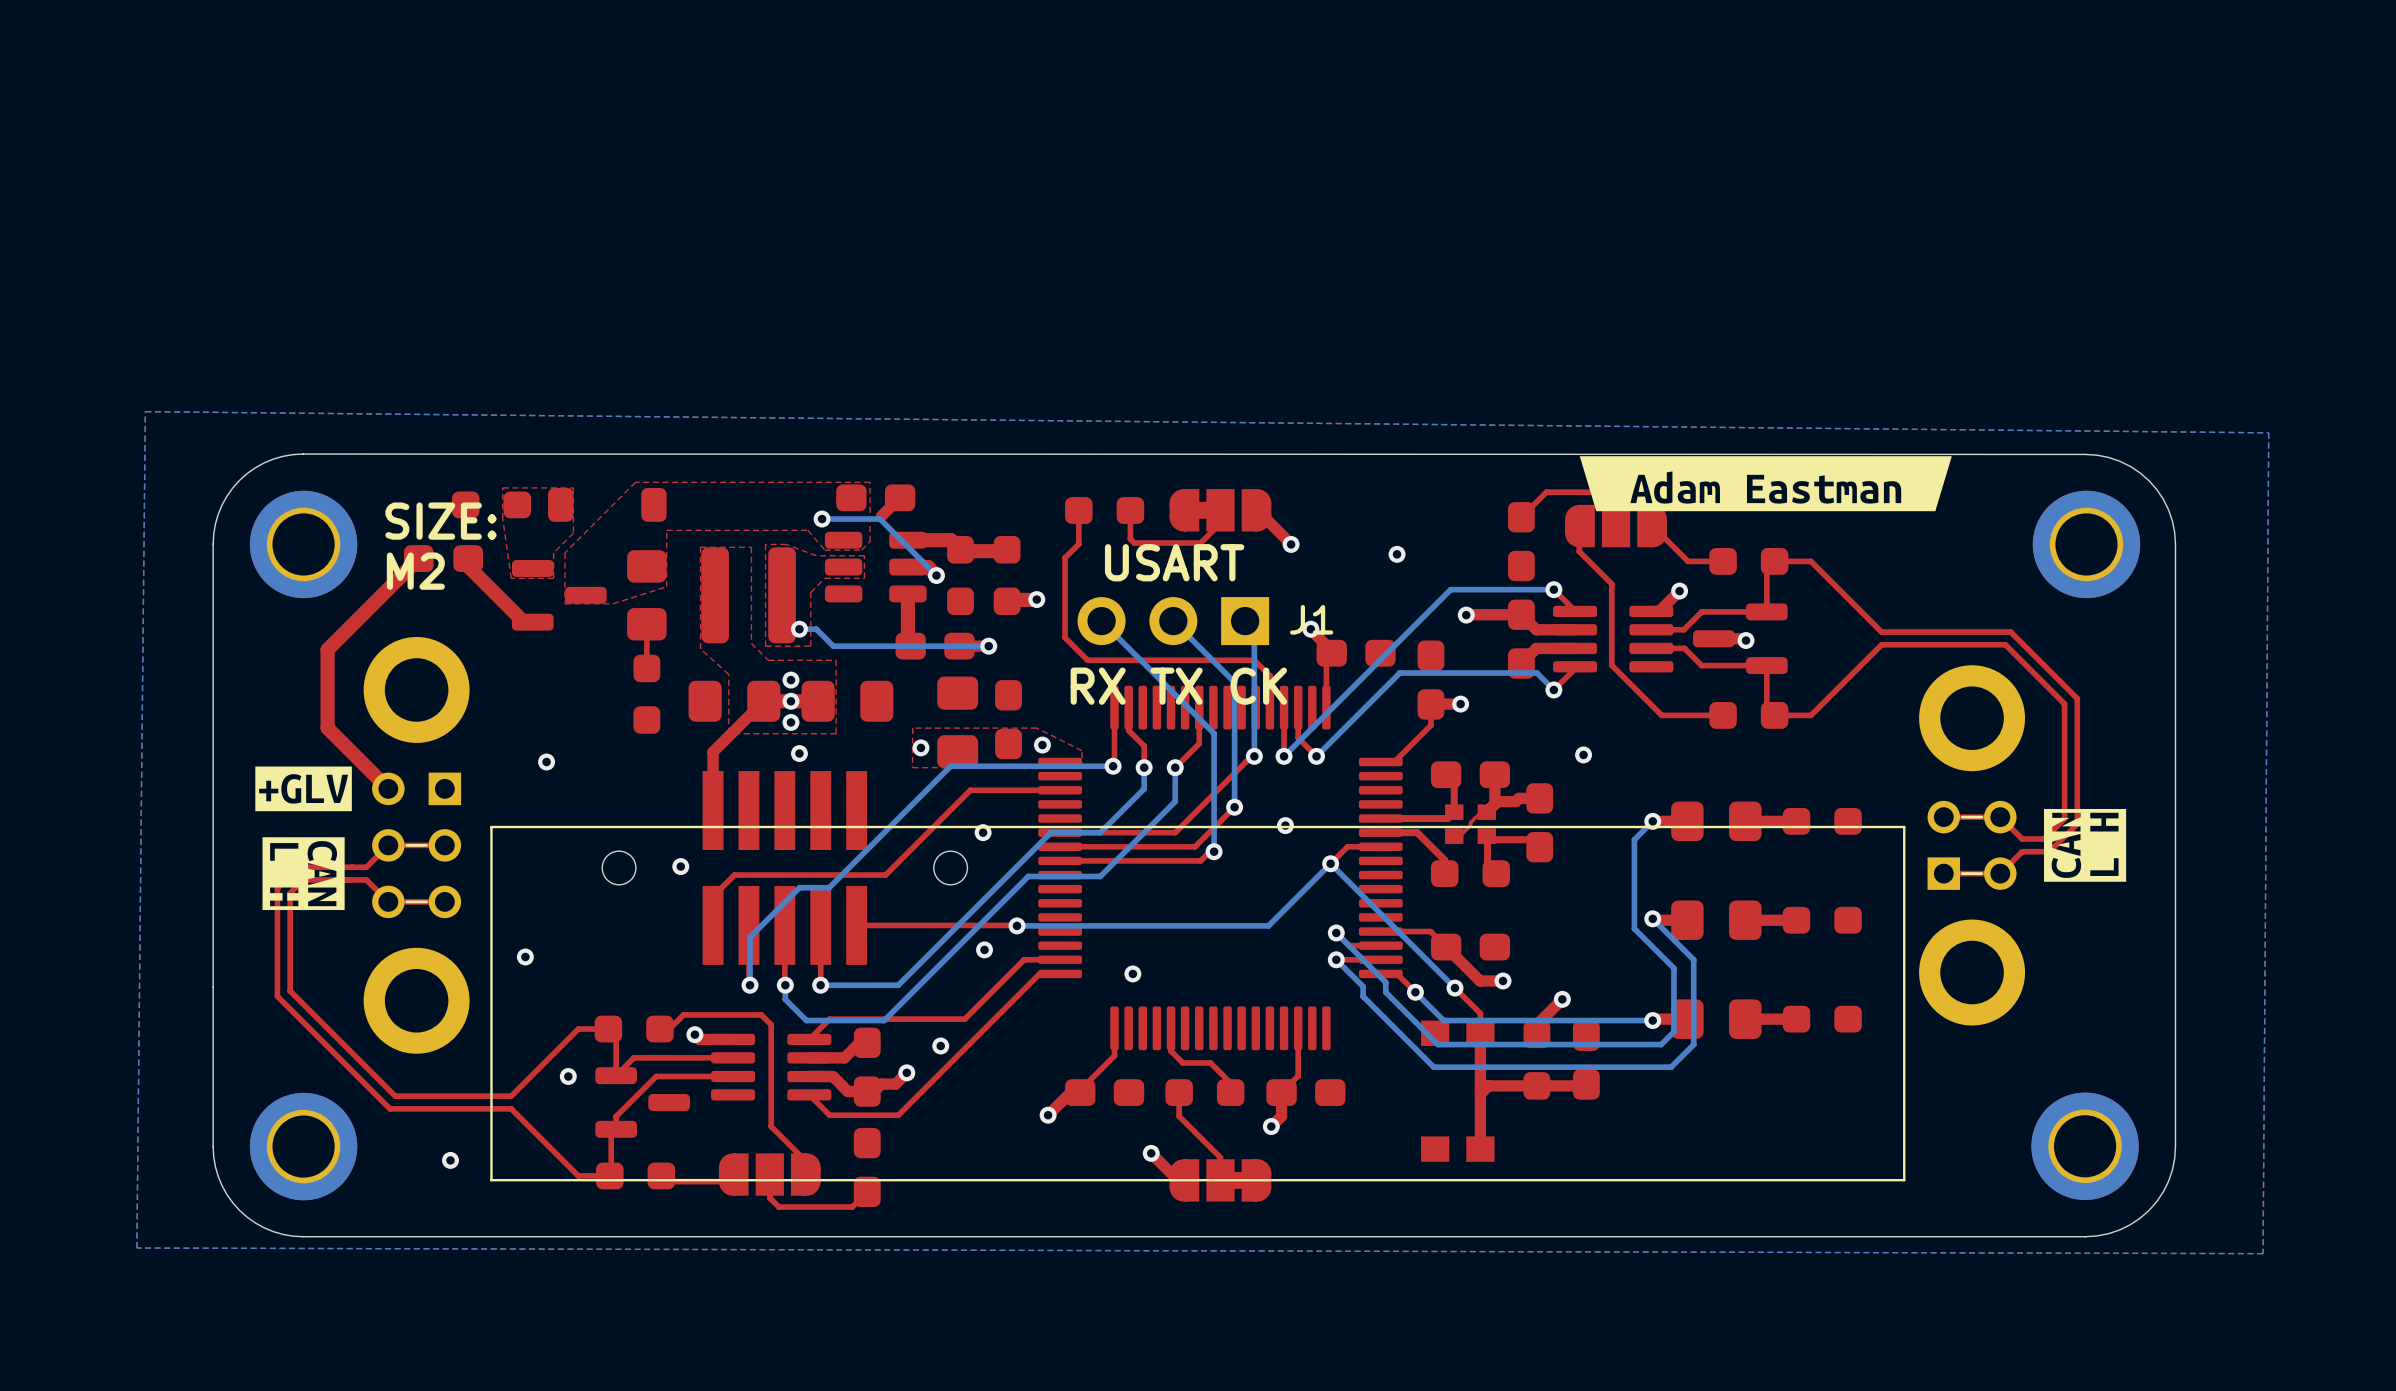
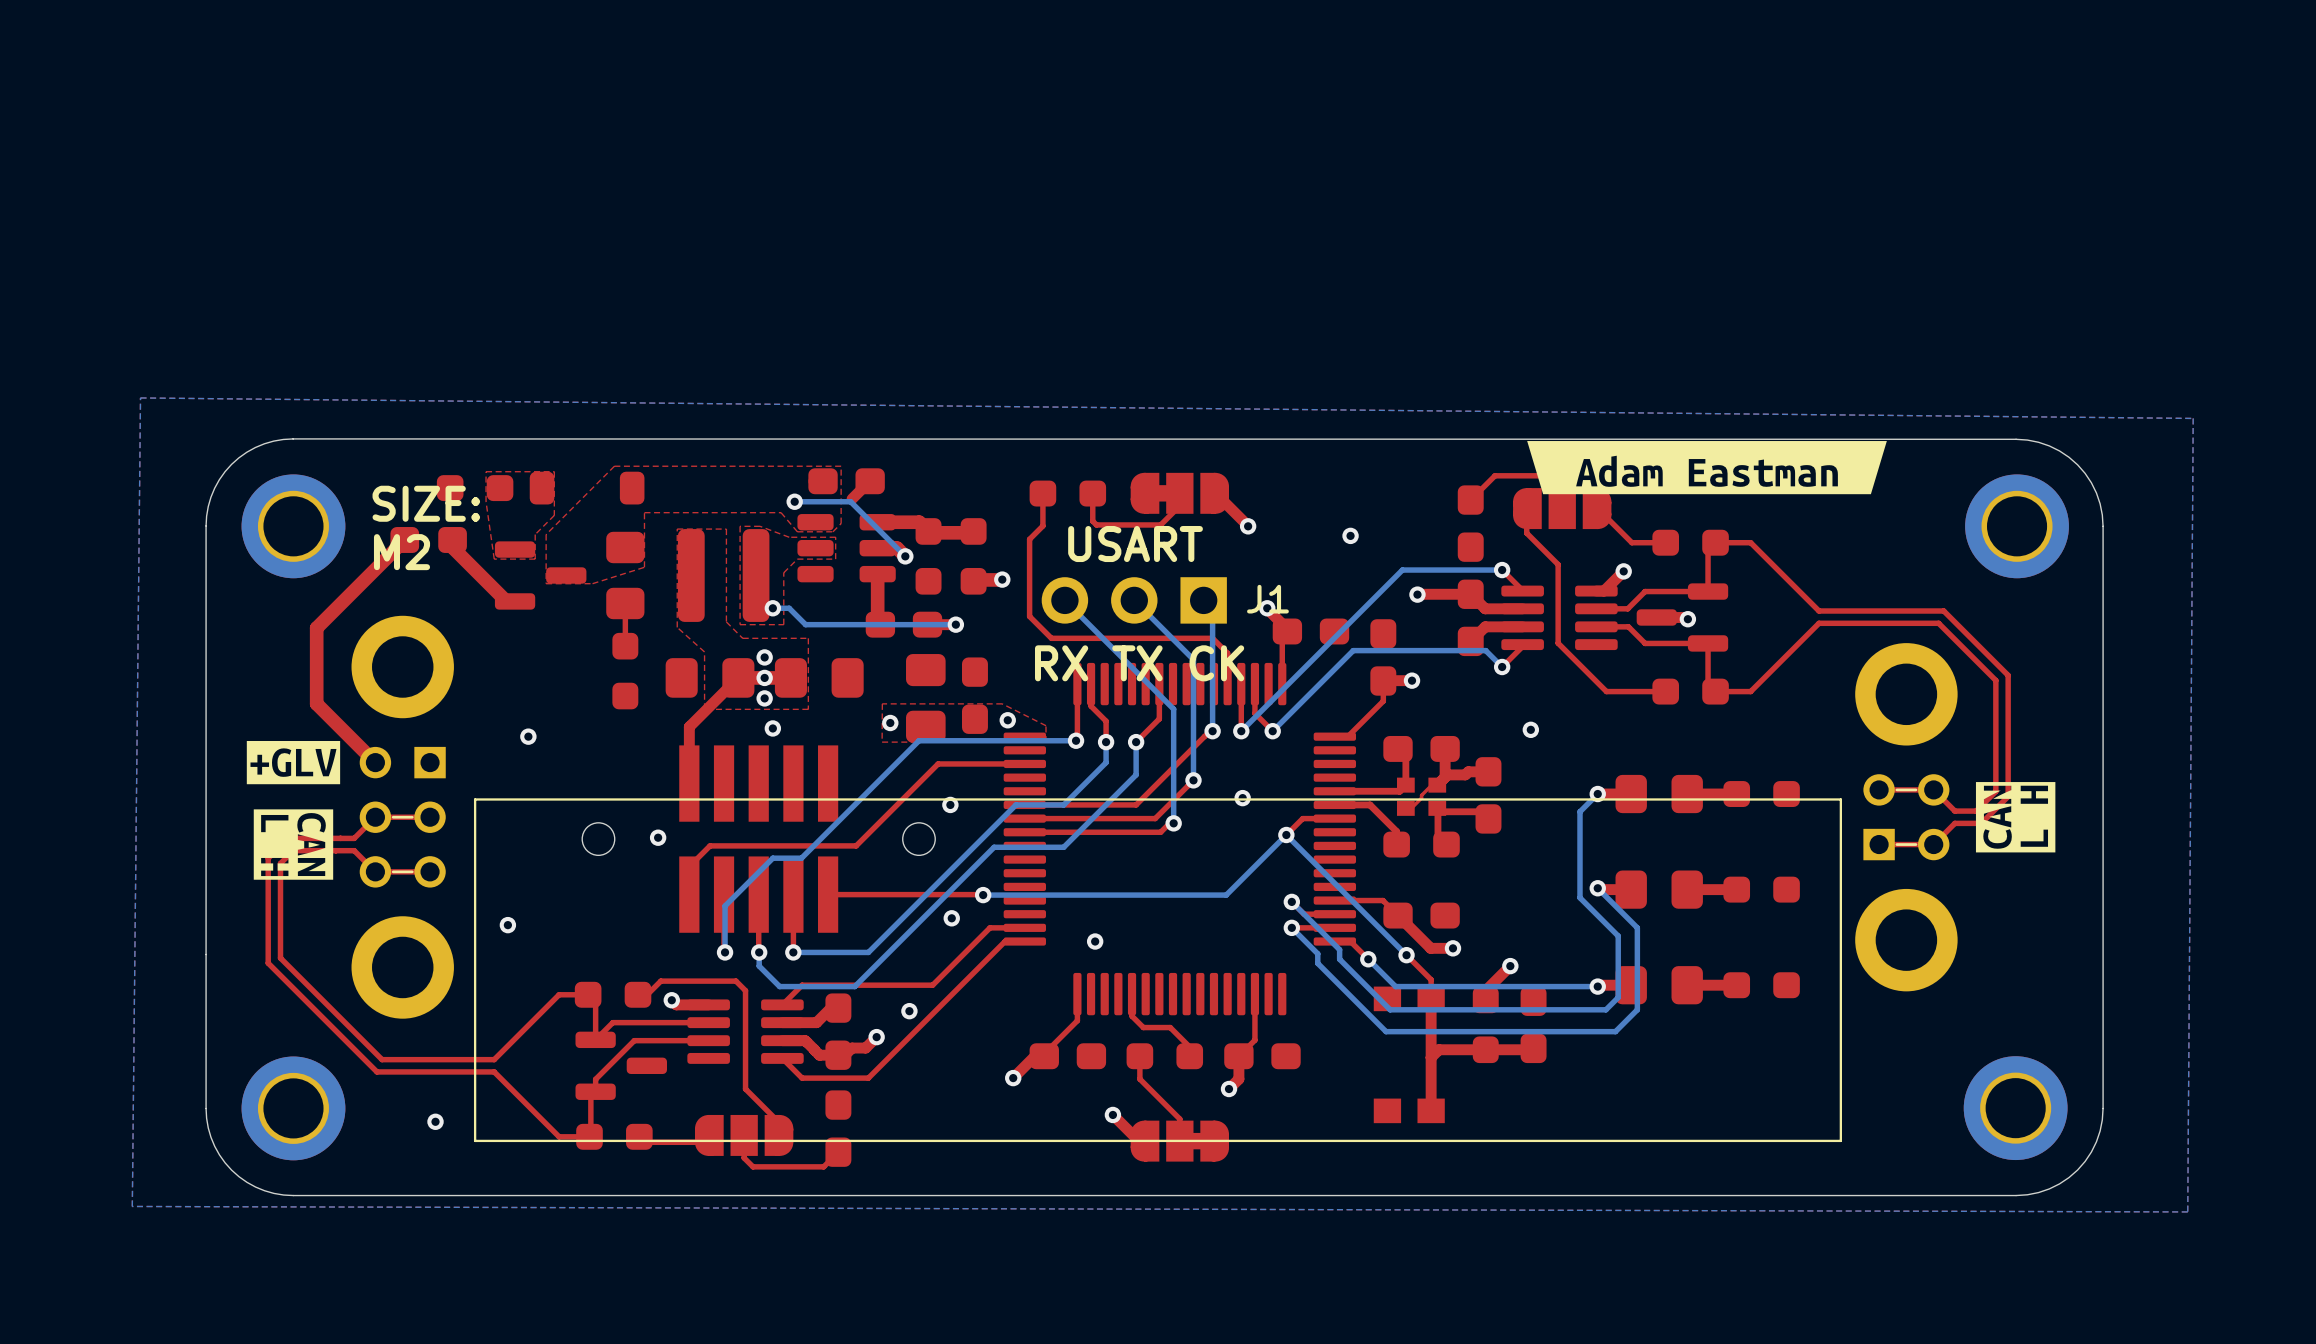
via: (568, 1076) -> none

